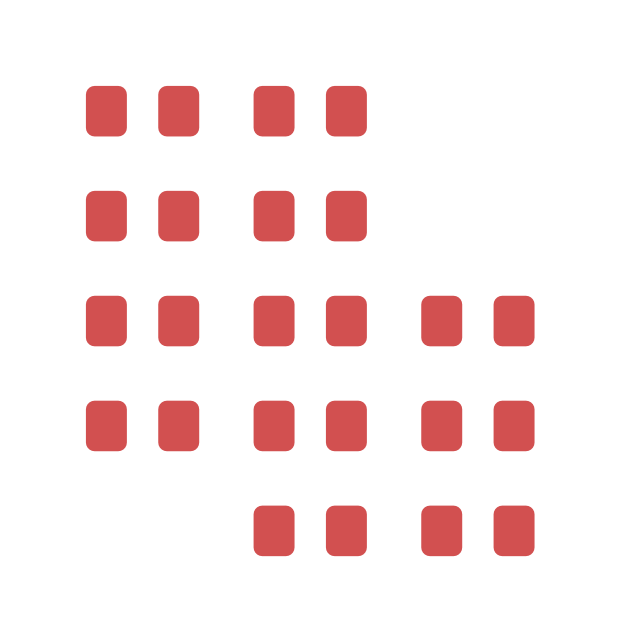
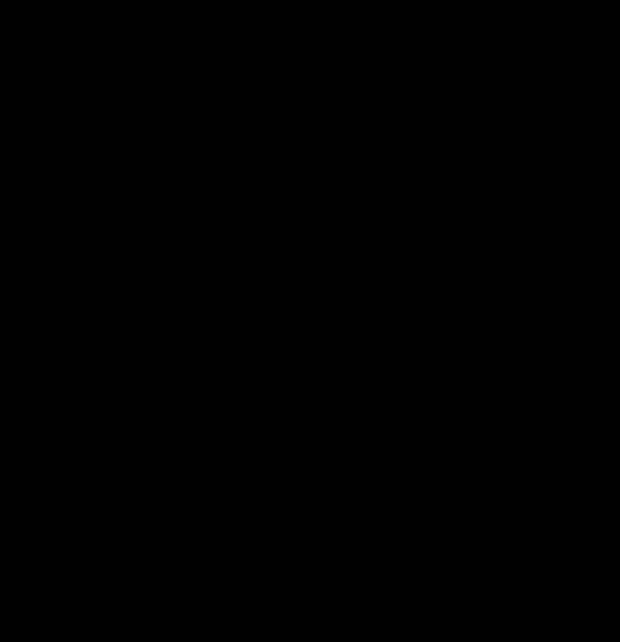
part: (142, 111) -> none
part: (310, 111) -> none
part: (142, 216) -> none
part: (310, 216) -> none
part: (142, 321) -> none
part: (310, 321) -> none
part: (477, 321) -> none
part: (142, 425) -> none
part: (310, 425) -> none
part: (477, 425) -> none
part: (310, 530) -> none
part: (477, 530) -> none

